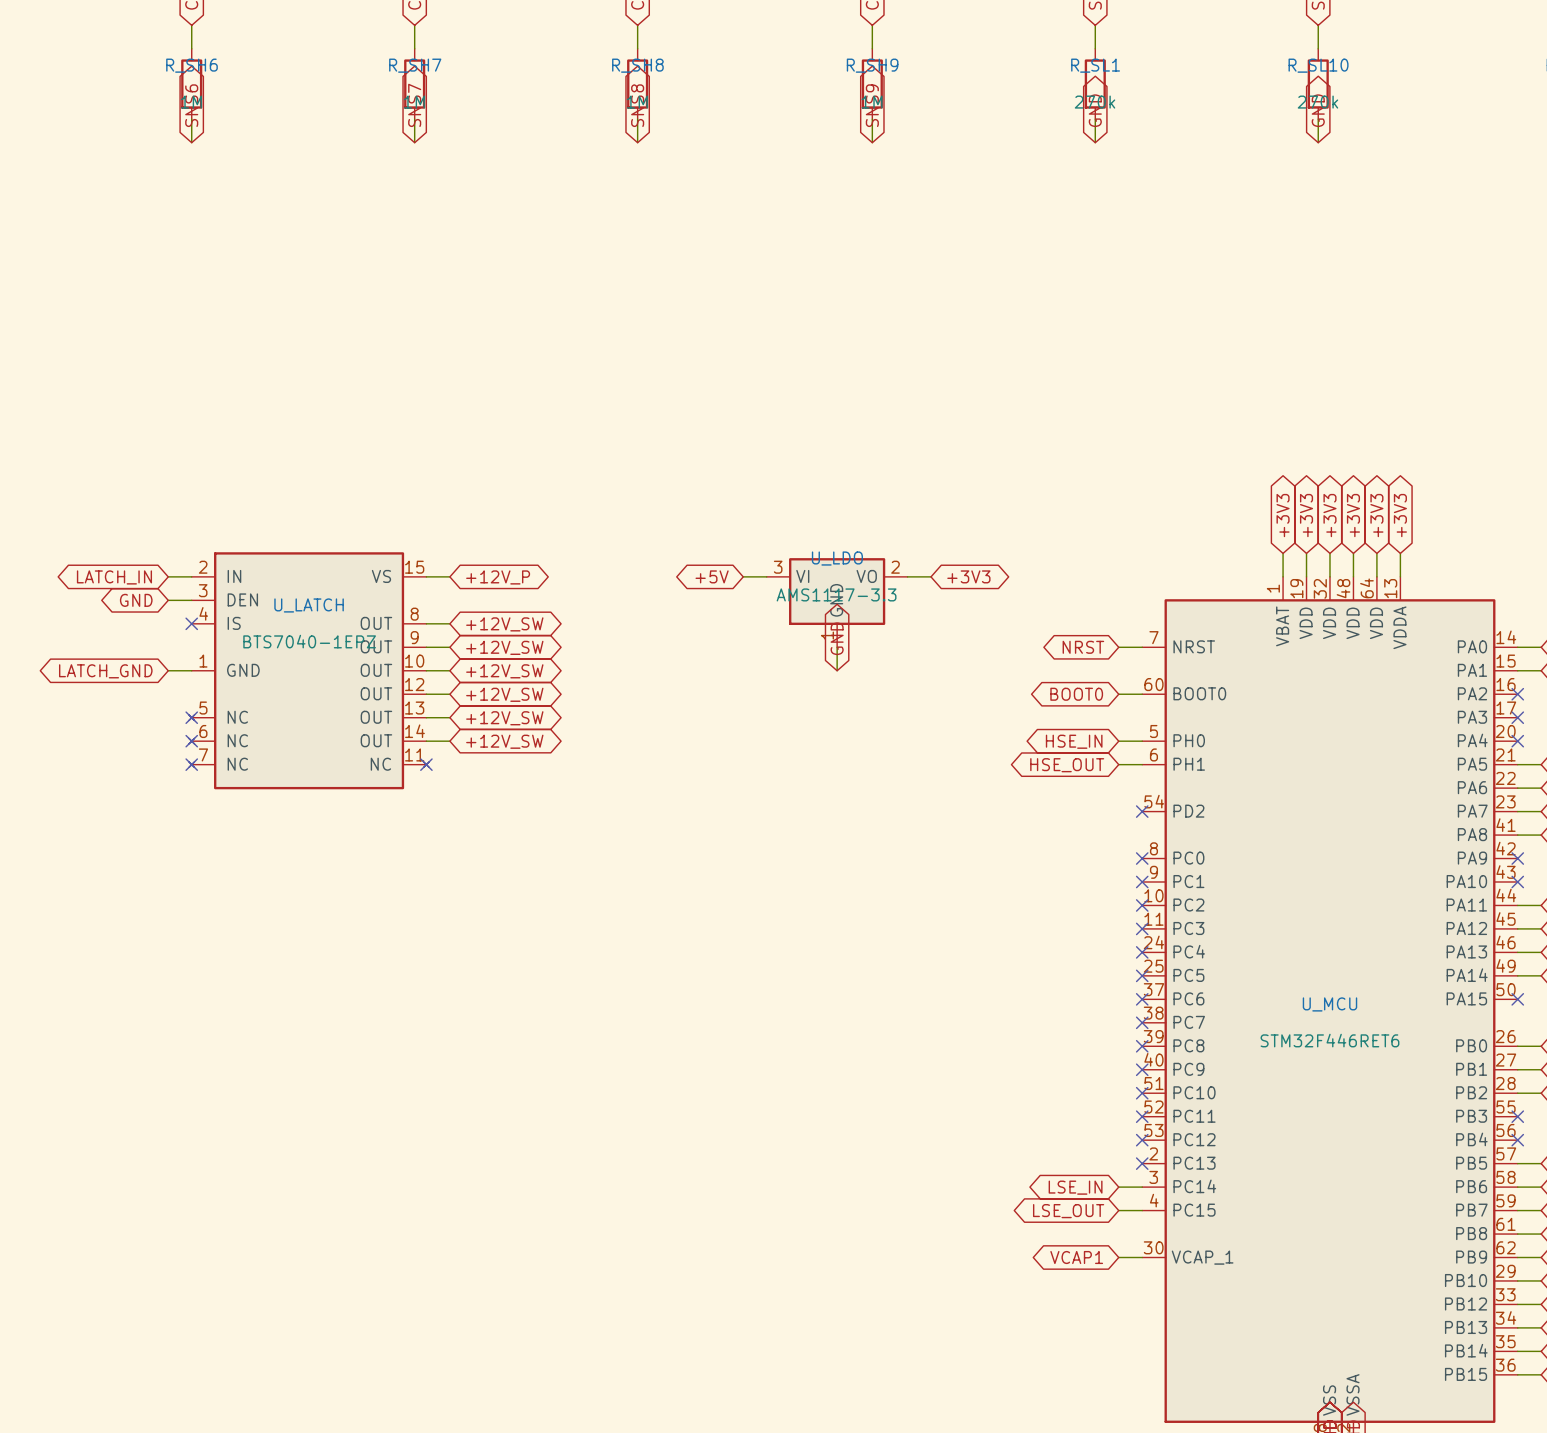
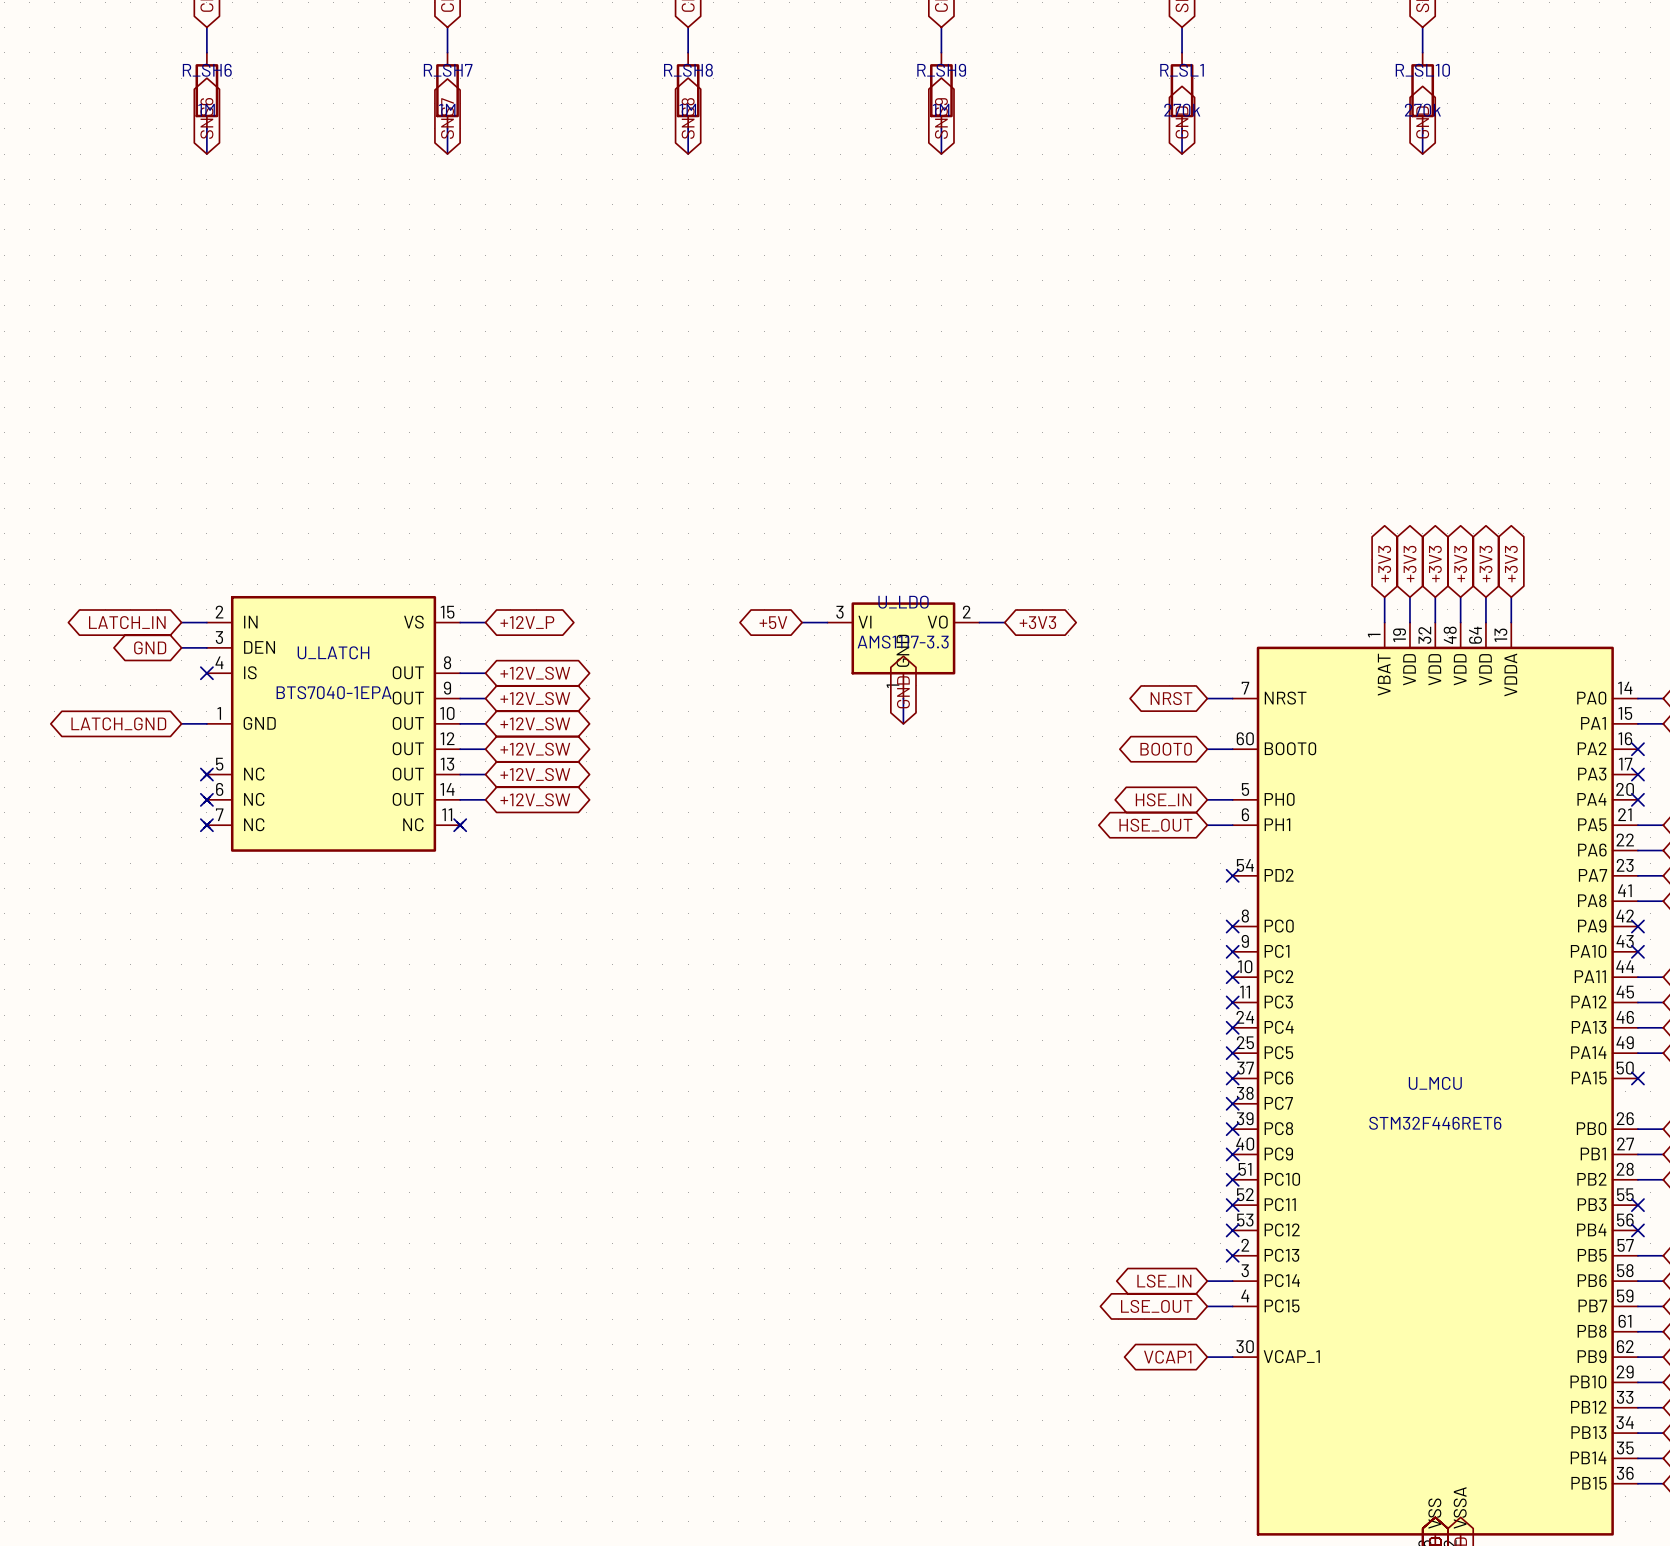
U_LATCH value: BTS7040-1EPZ (309, 641) -> BTS7040-1EPA (334, 692)

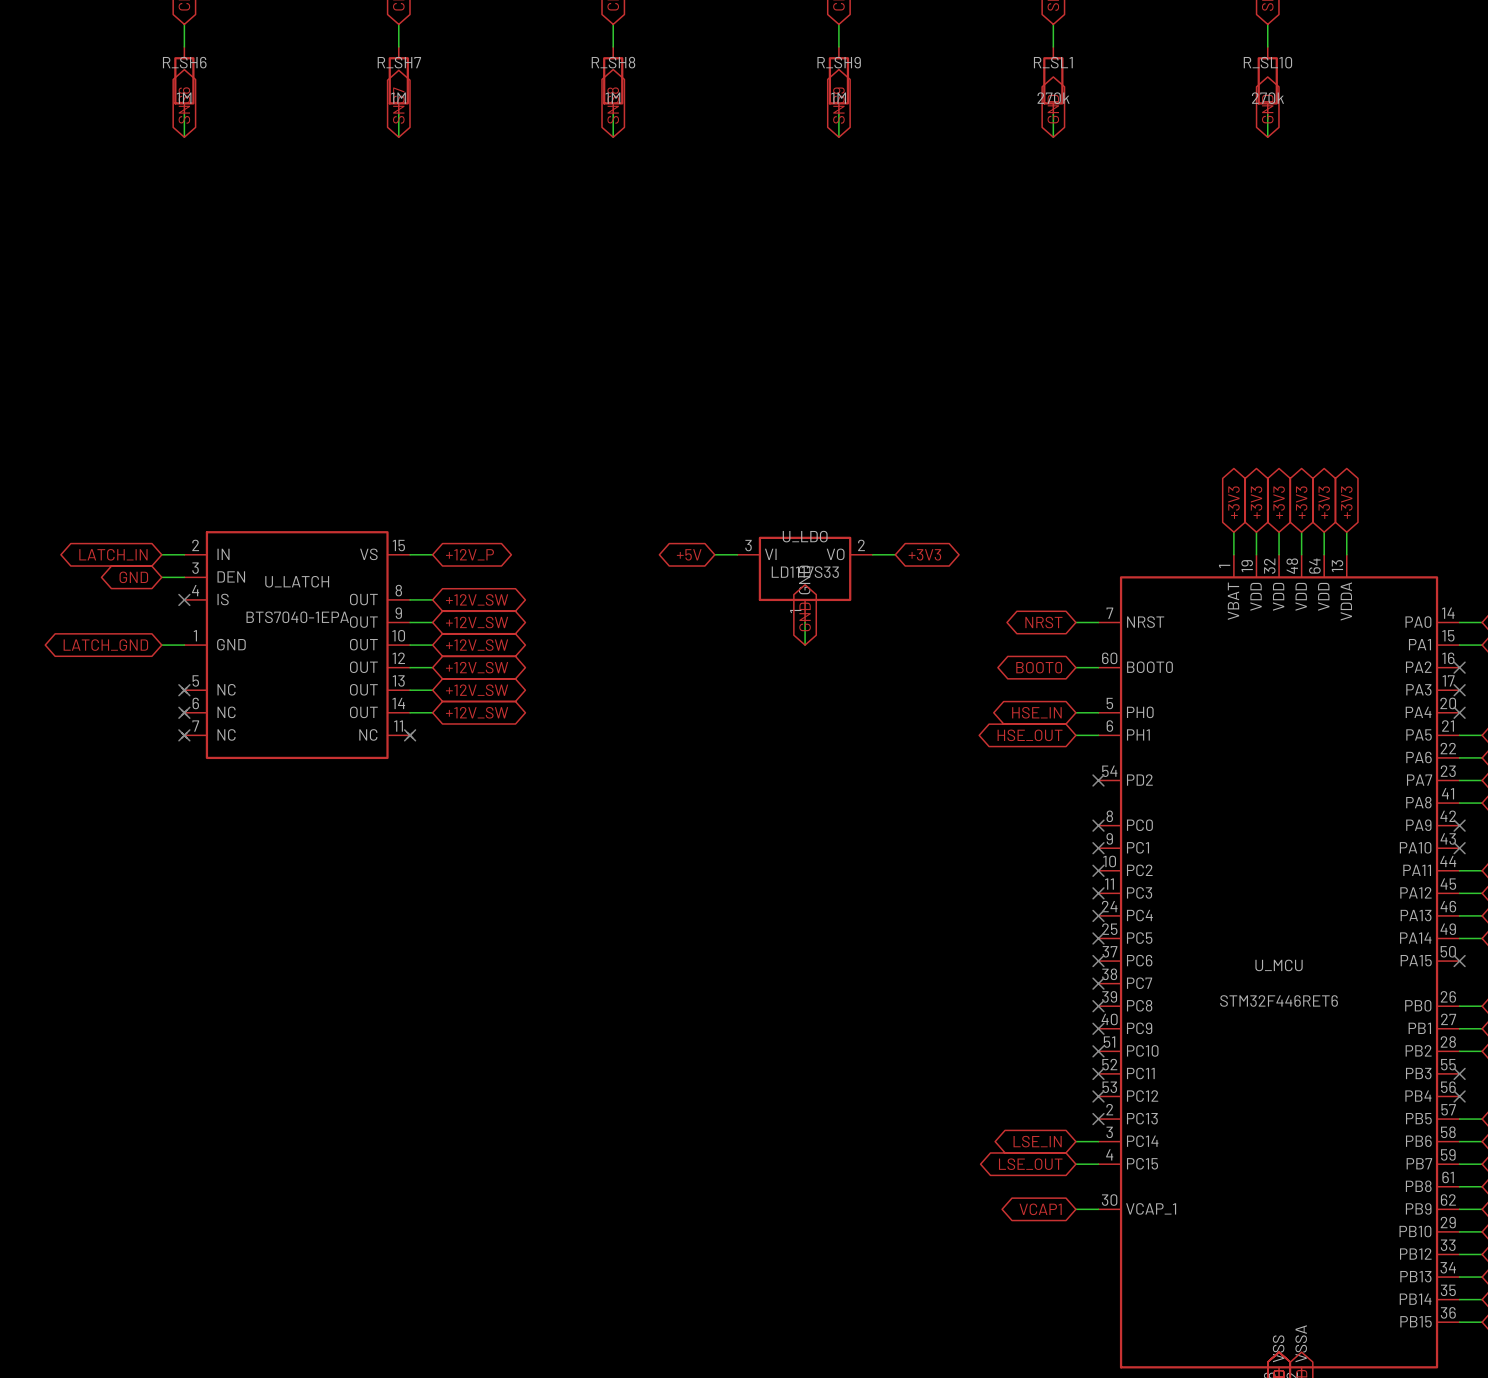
U_LDO value: AMS1117-3.3 (903, 642) -> LD1117S33 (805, 572)

